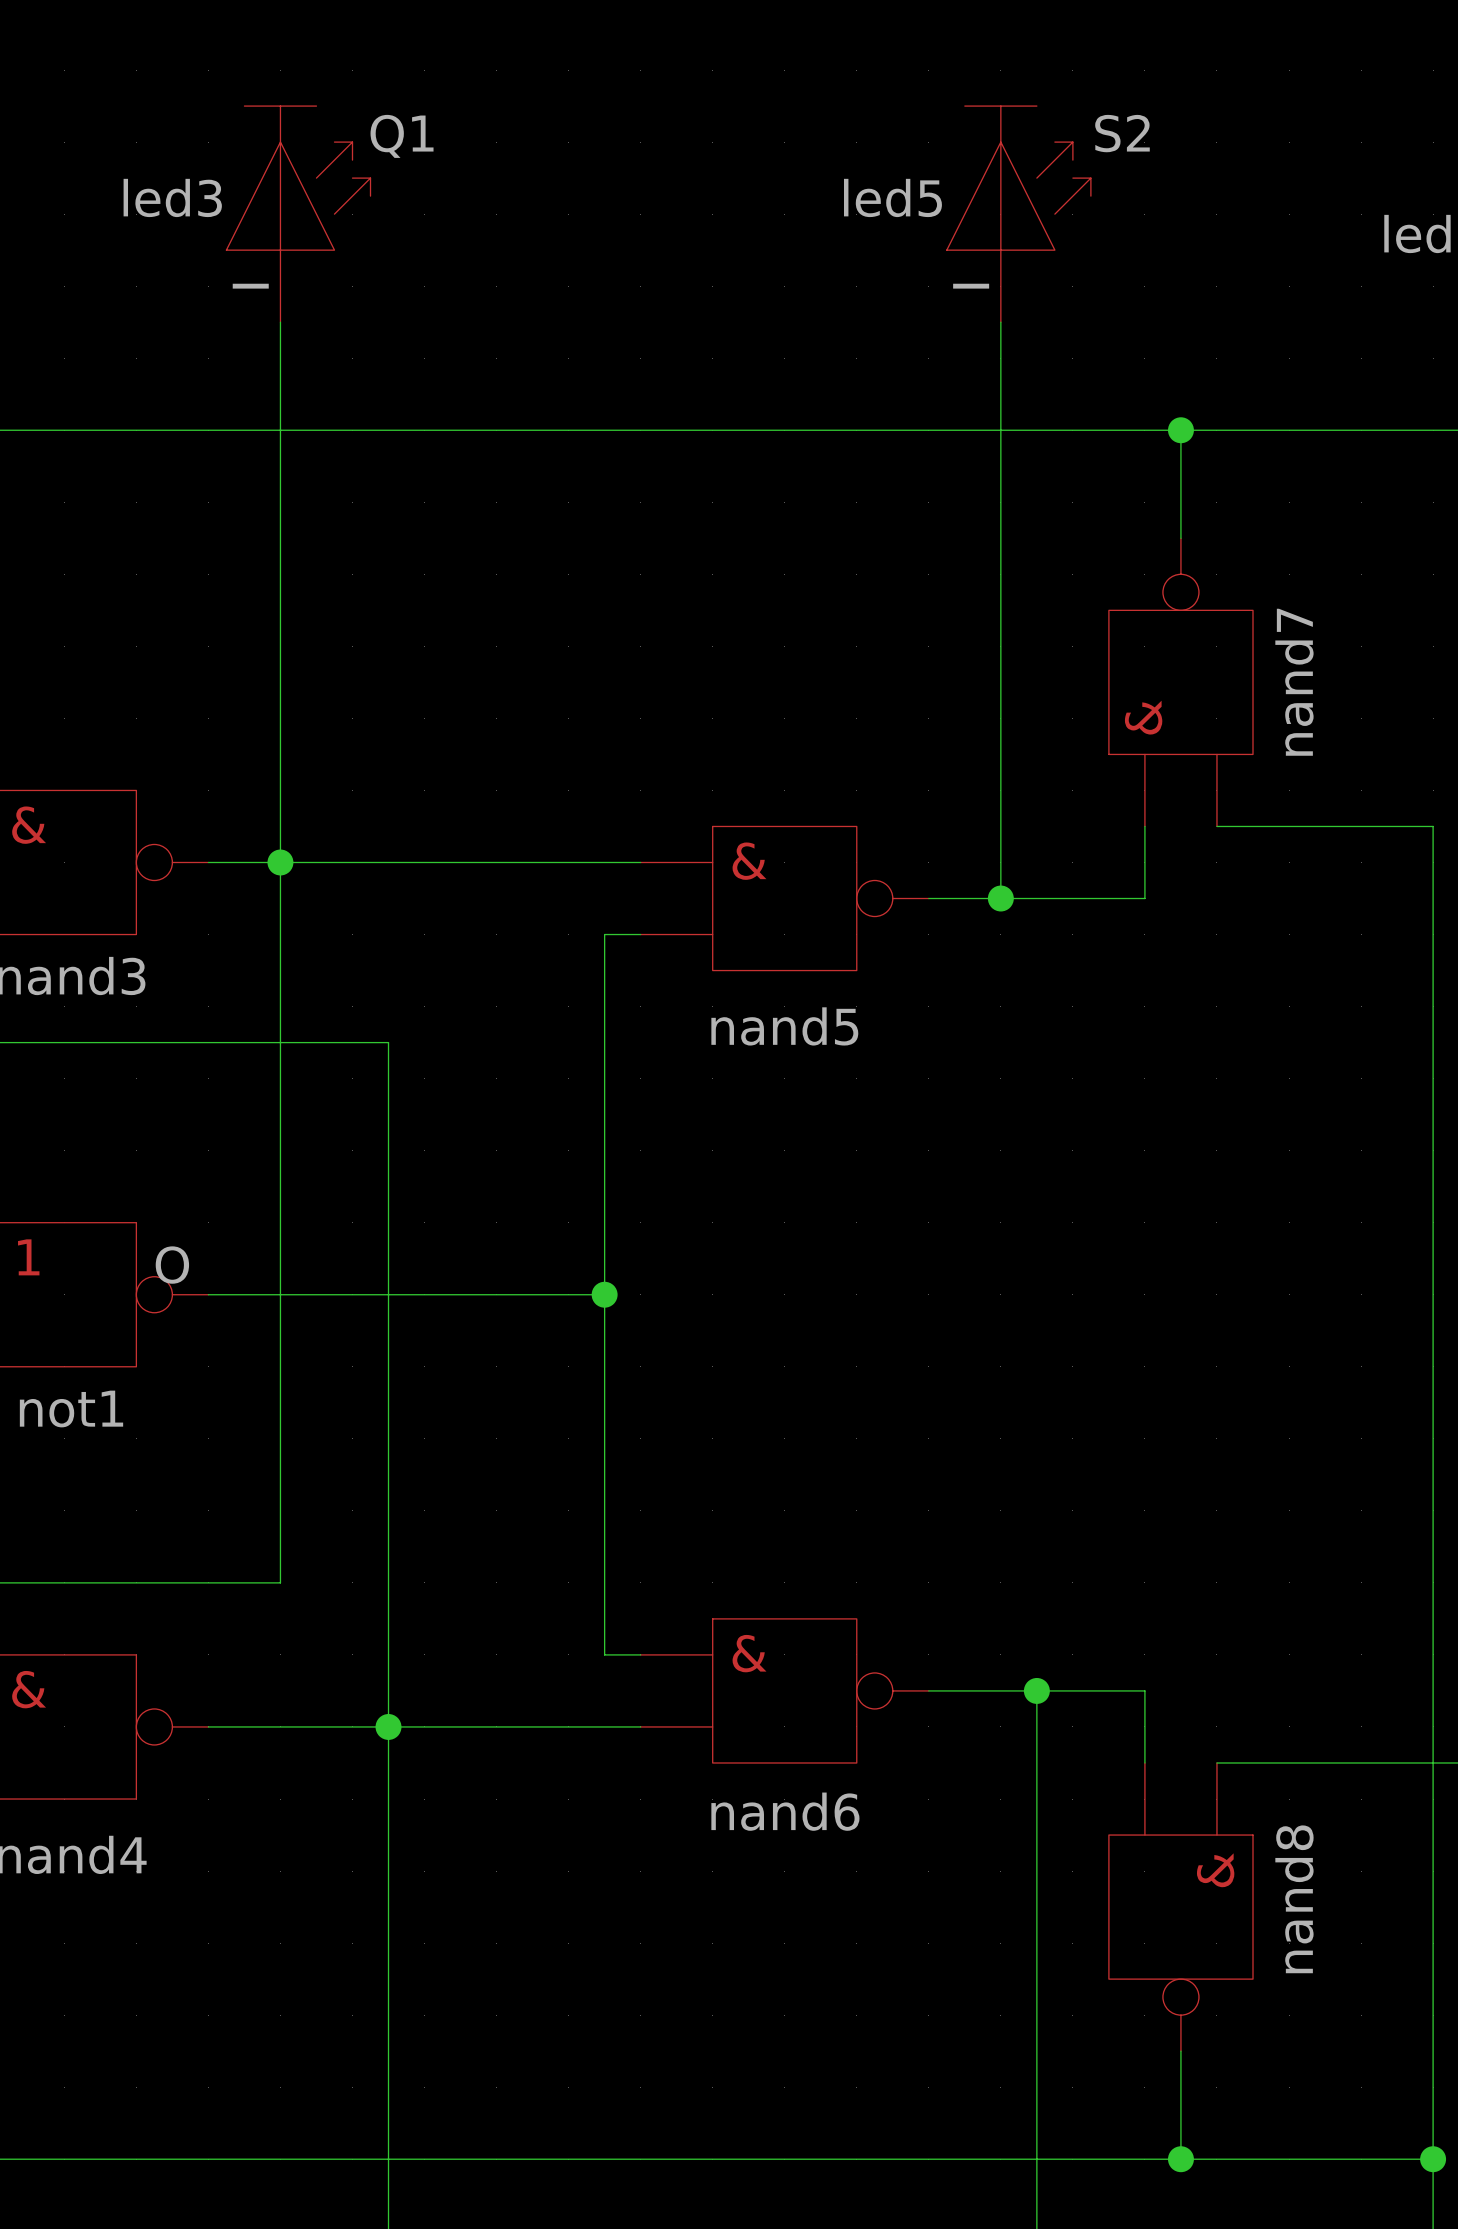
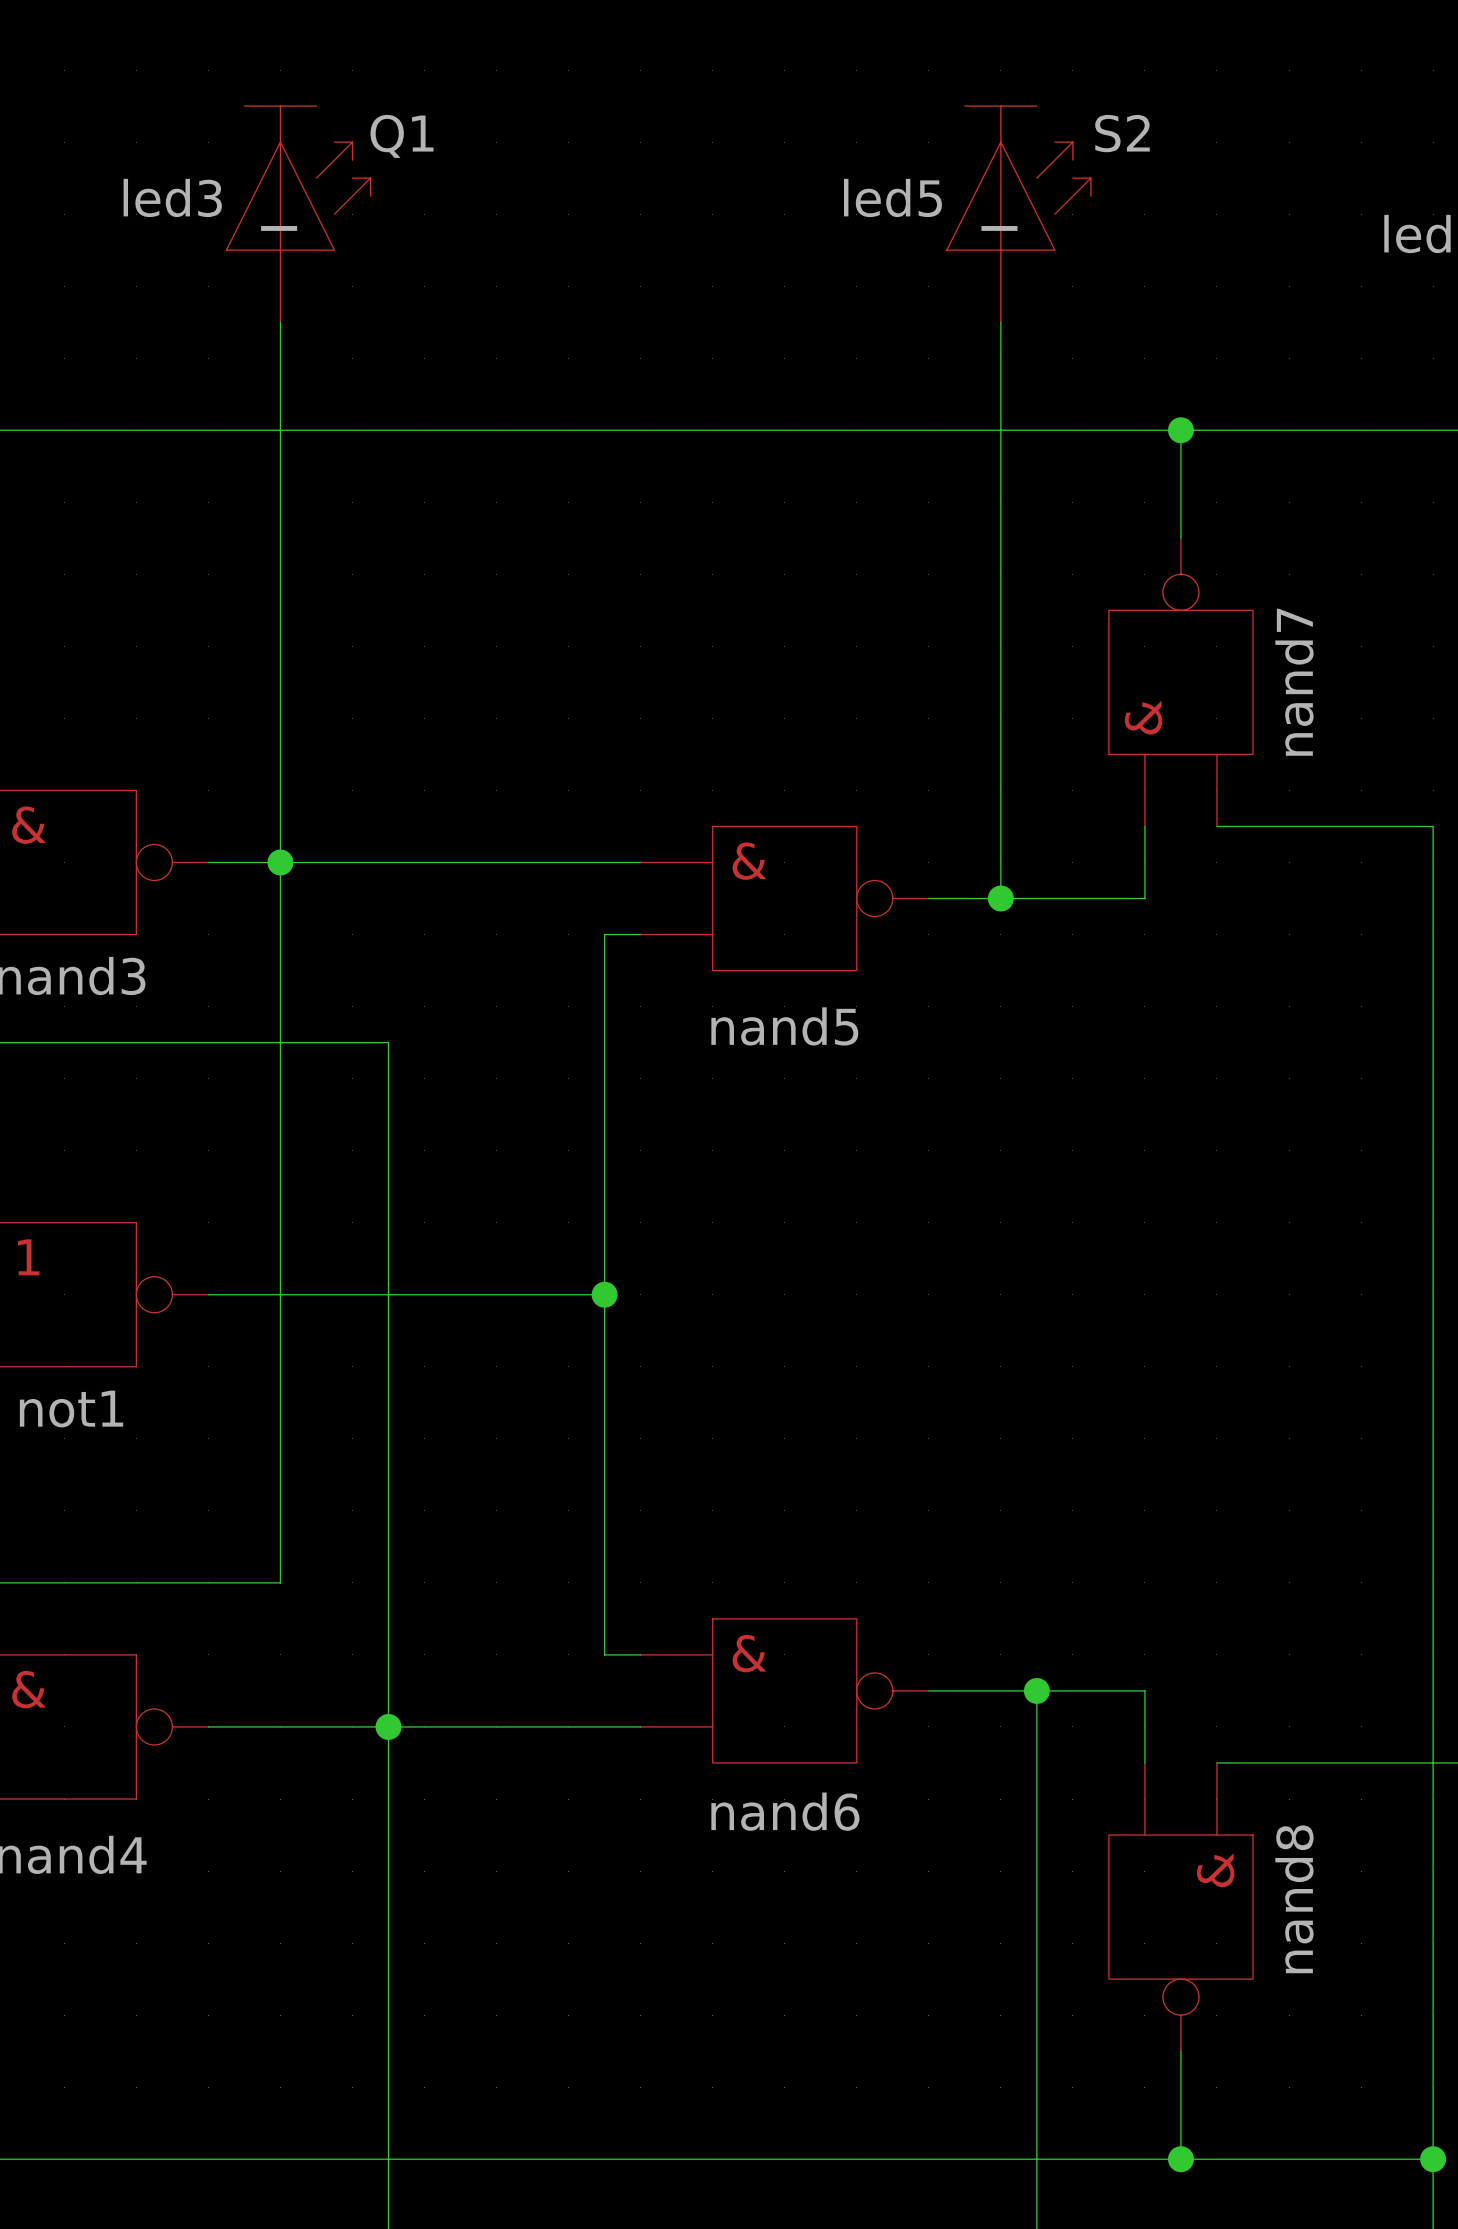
led3 pin name: none -> I (279, 228)
led5 pin name: none -> I (999, 228)
led3 pin number: I (250, 286) -> none
led5 pin number: I (971, 286) -> none
not1 pin name: O (172, 1265) -> none

